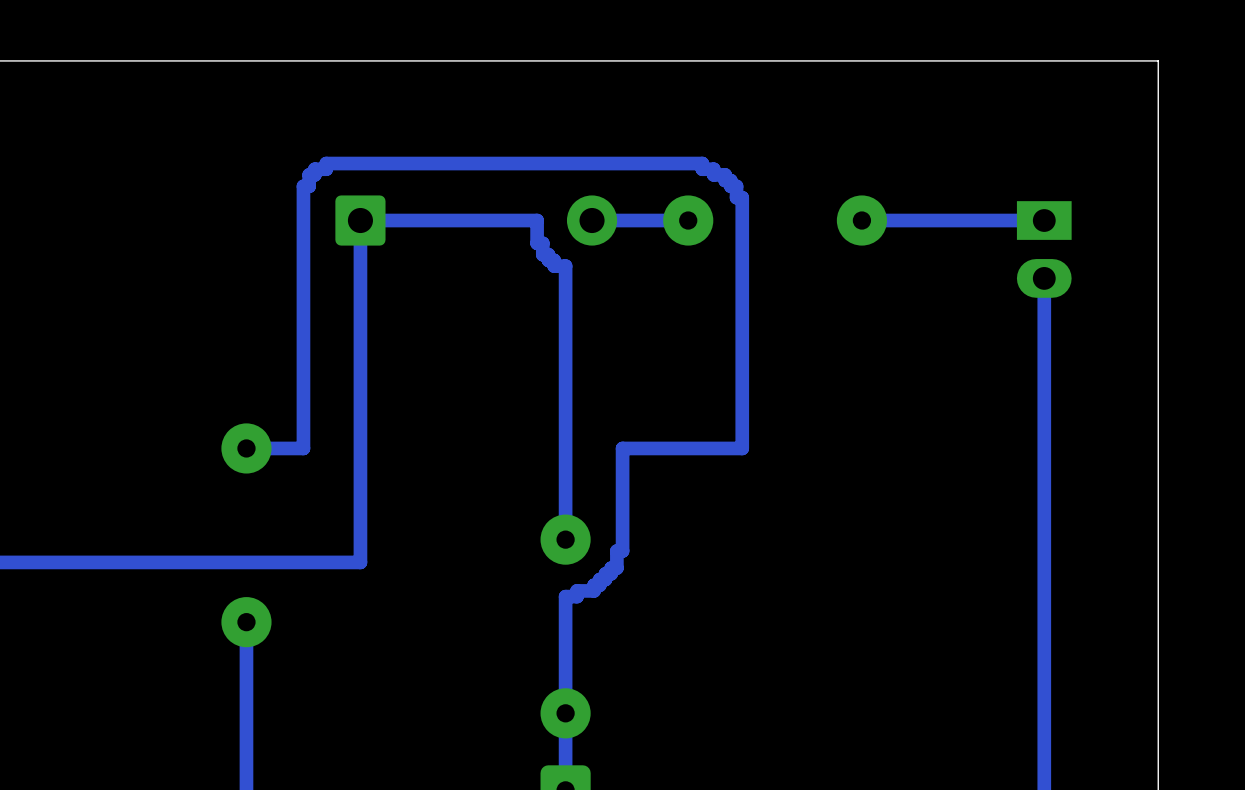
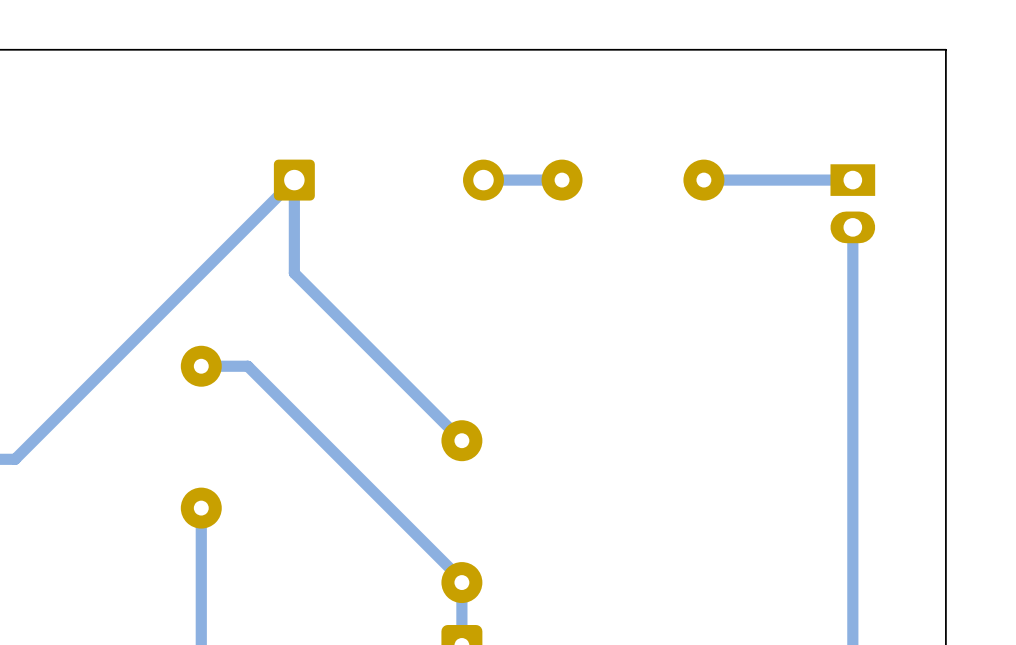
bottom track: (360, 220) (537, 220) (537, 243) (542, 243) (542, 254) (548, 254) (548, 260) (554, 260) (554, 266) (565, 266) (565, 539) -> (294, 273) (461, 440)
bottom track: (360, 334) (360, 562) (18, 562) -> (294, 180) (15, 459)
bottom track: (303, 448) (303, 186) (309, 186) (309, 174) (314, 174) (314, 169) (326, 169) (326, 163) (702, 163) (702, 169) (713, 169) (713, 174) (725, 174) (725, 180) (730, 180) (730, 186) (736, 186) (736, 197) (742, 197) (742, 448) (622, 448) (622, 551) (616, 551) (616, 568) (611, 568) (611, 573) (605, 573) (605, 579) (599, 579) (599, 585) (594, 585) (594, 590) (576, 590) (576, 596) (565, 596) (565, 710) -> (247, 366) (461, 580)

